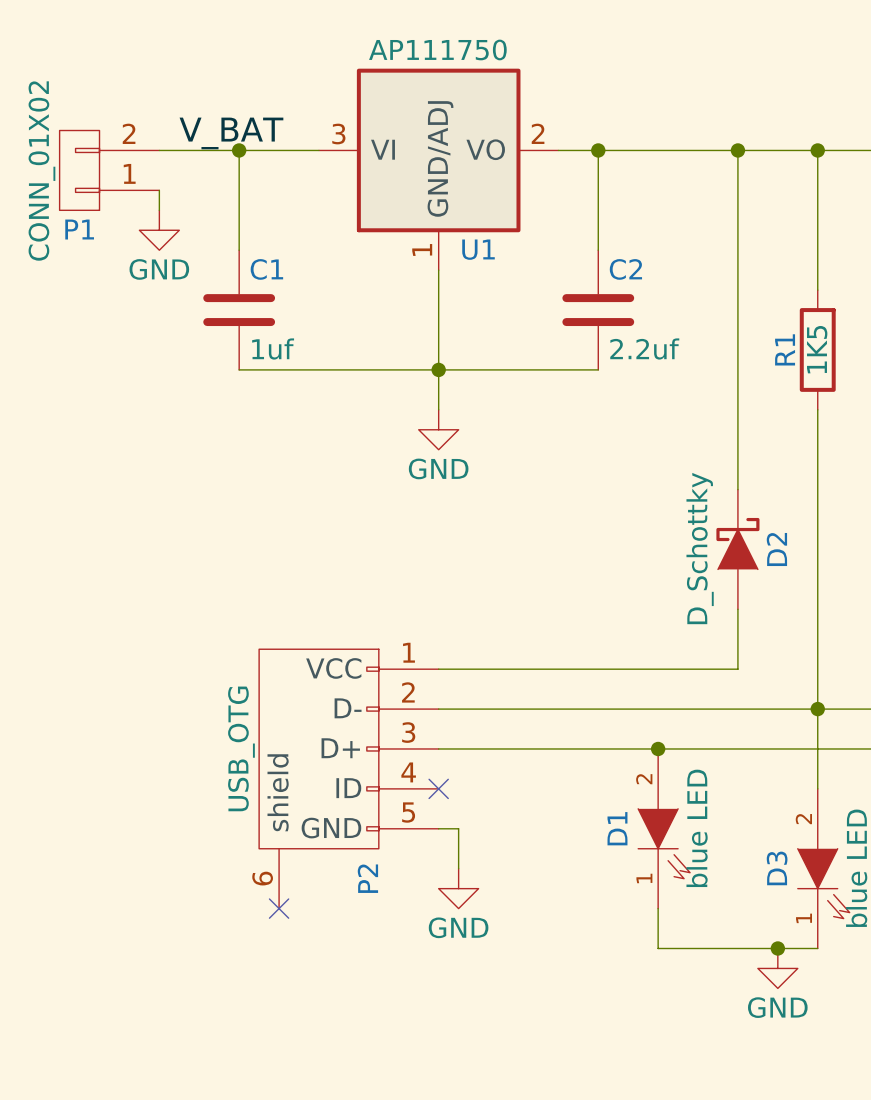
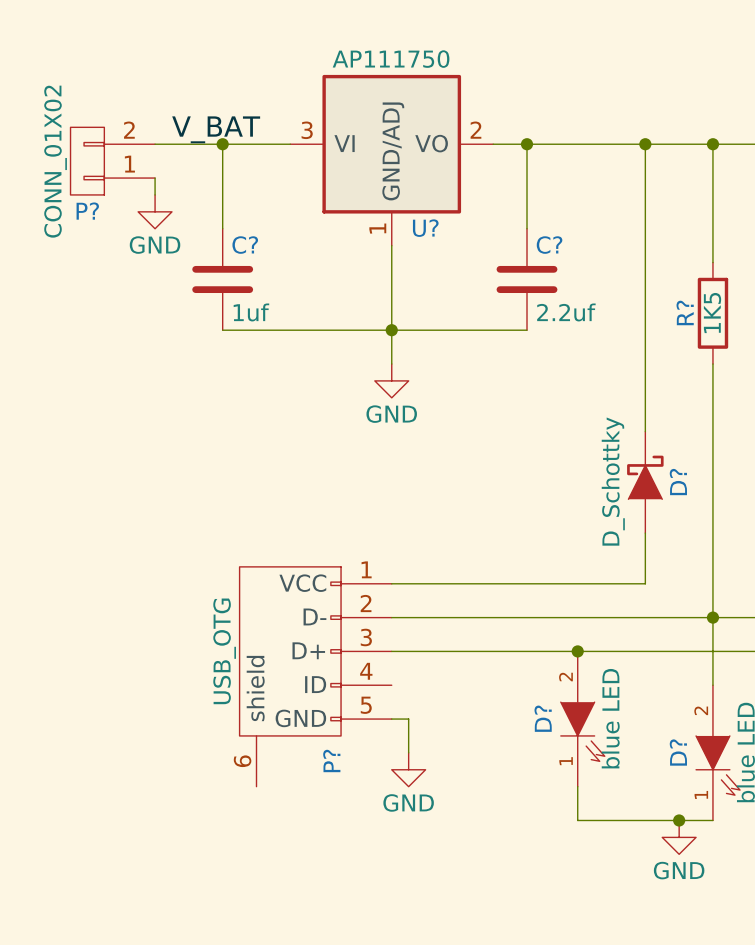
P1 name: P1 (79, 229) -> P? (87, 211)
U1 name: U1 (478, 249) -> U? (425, 228)
C1 name: C1 (266, 269) -> C? (245, 245)
C2 name: C2 (625, 269) -> C? (549, 245)
R1 name: R1 (785, 349) -> R? (685, 312)
D2 name: D2 (776, 549) -> D? (678, 482)
no-connect mark: (438, 788) -> none
D1 name: D1 (617, 828) -> D? (543, 718)
D3 name: D3 (777, 868) -> D? (678, 752)
P2 name: P2 (367, 878) -> P? (331, 760)
no-connect mark: (279, 908) -> none

